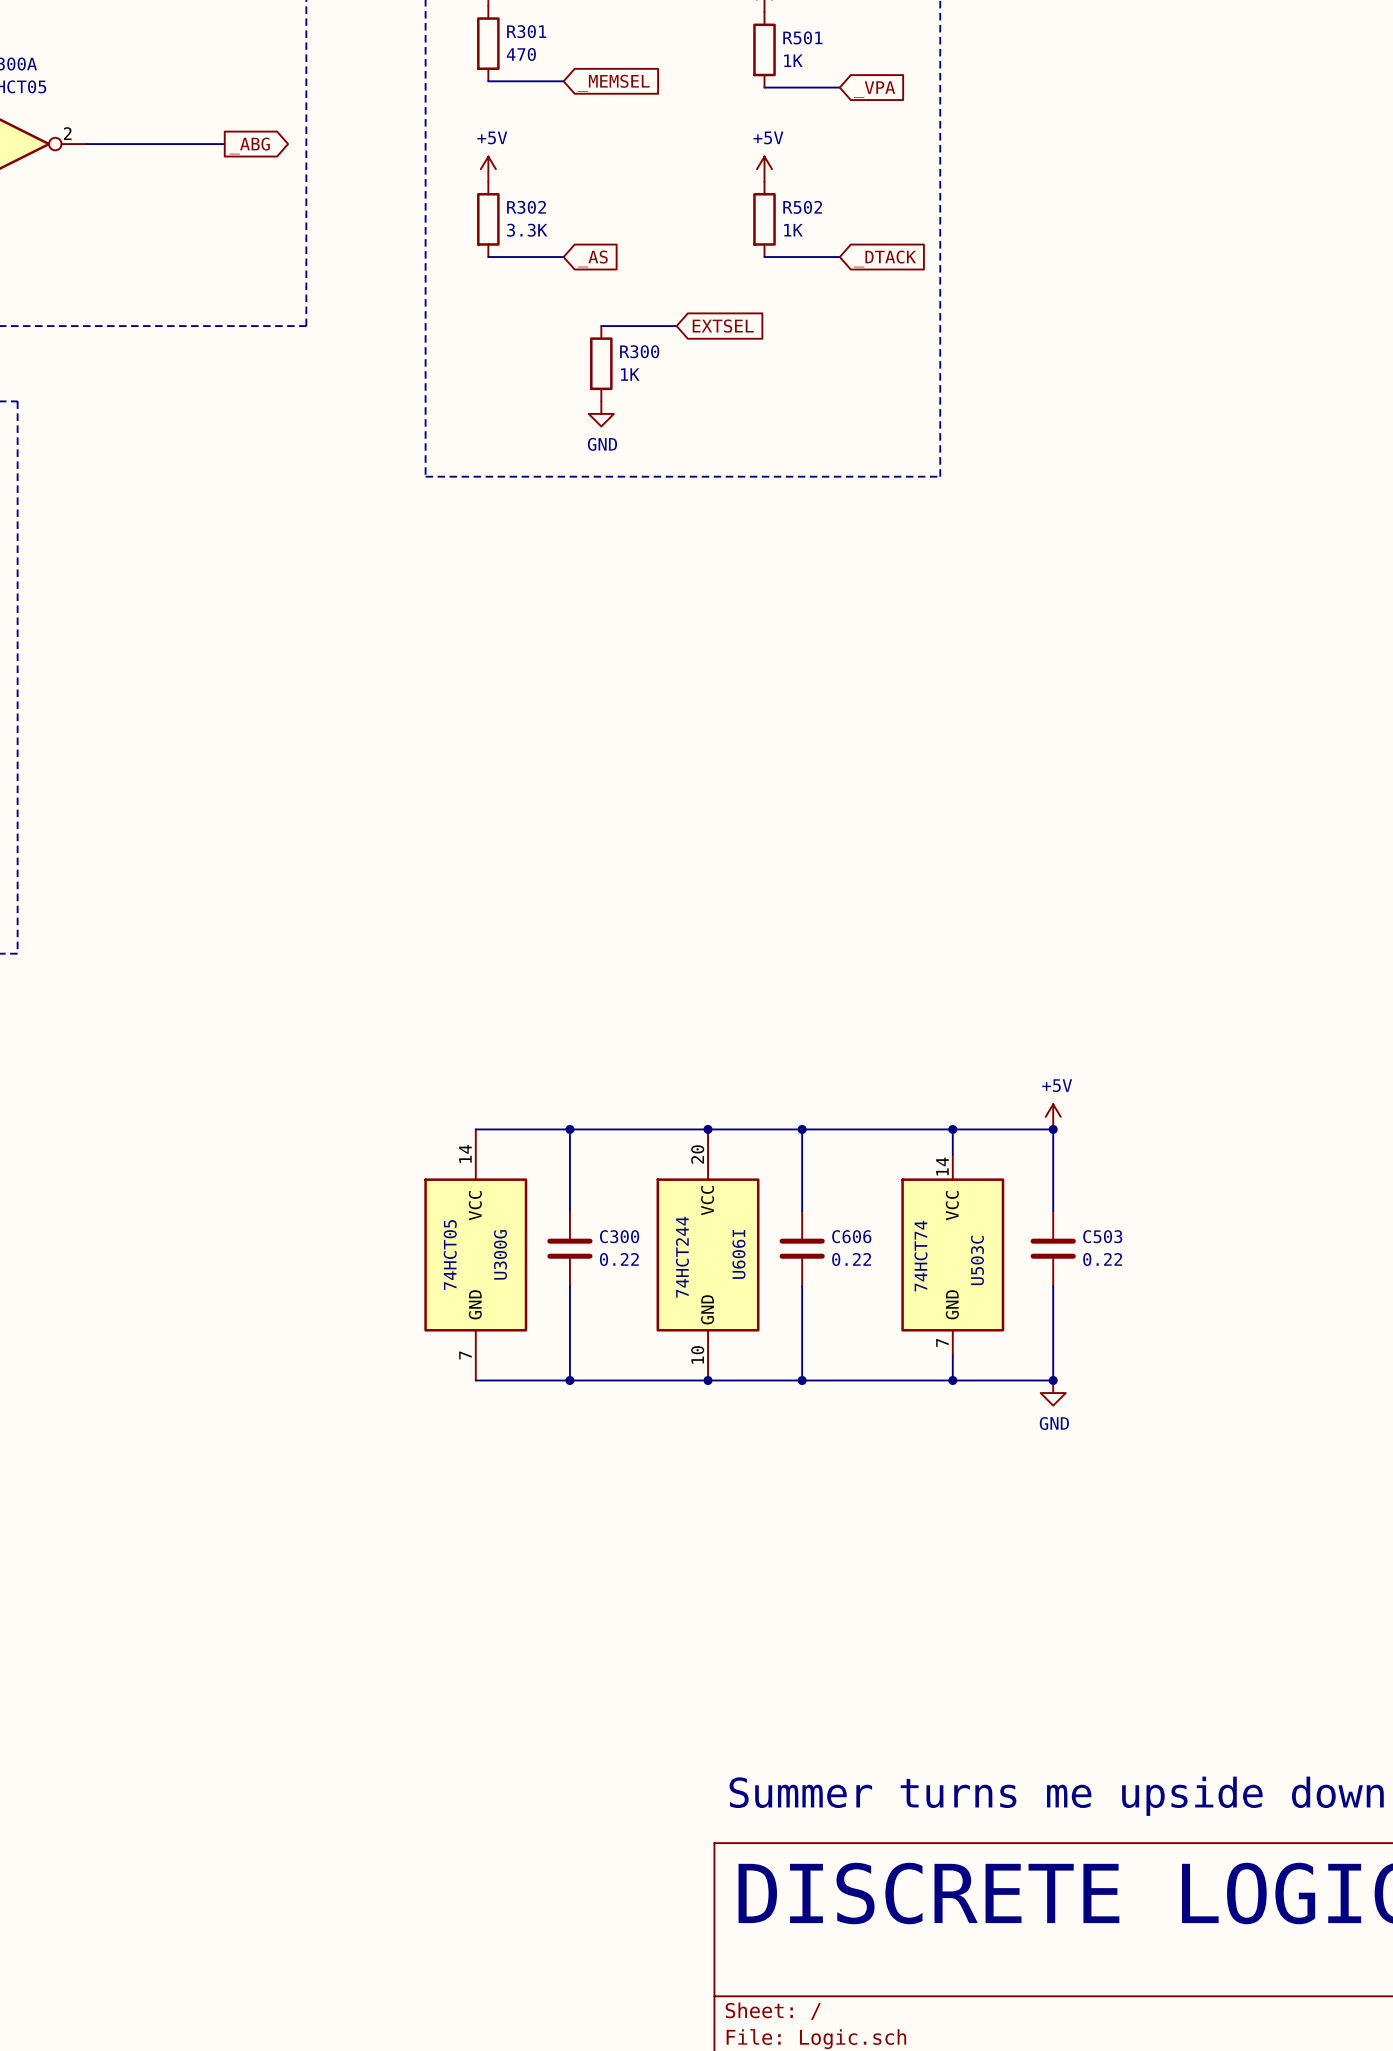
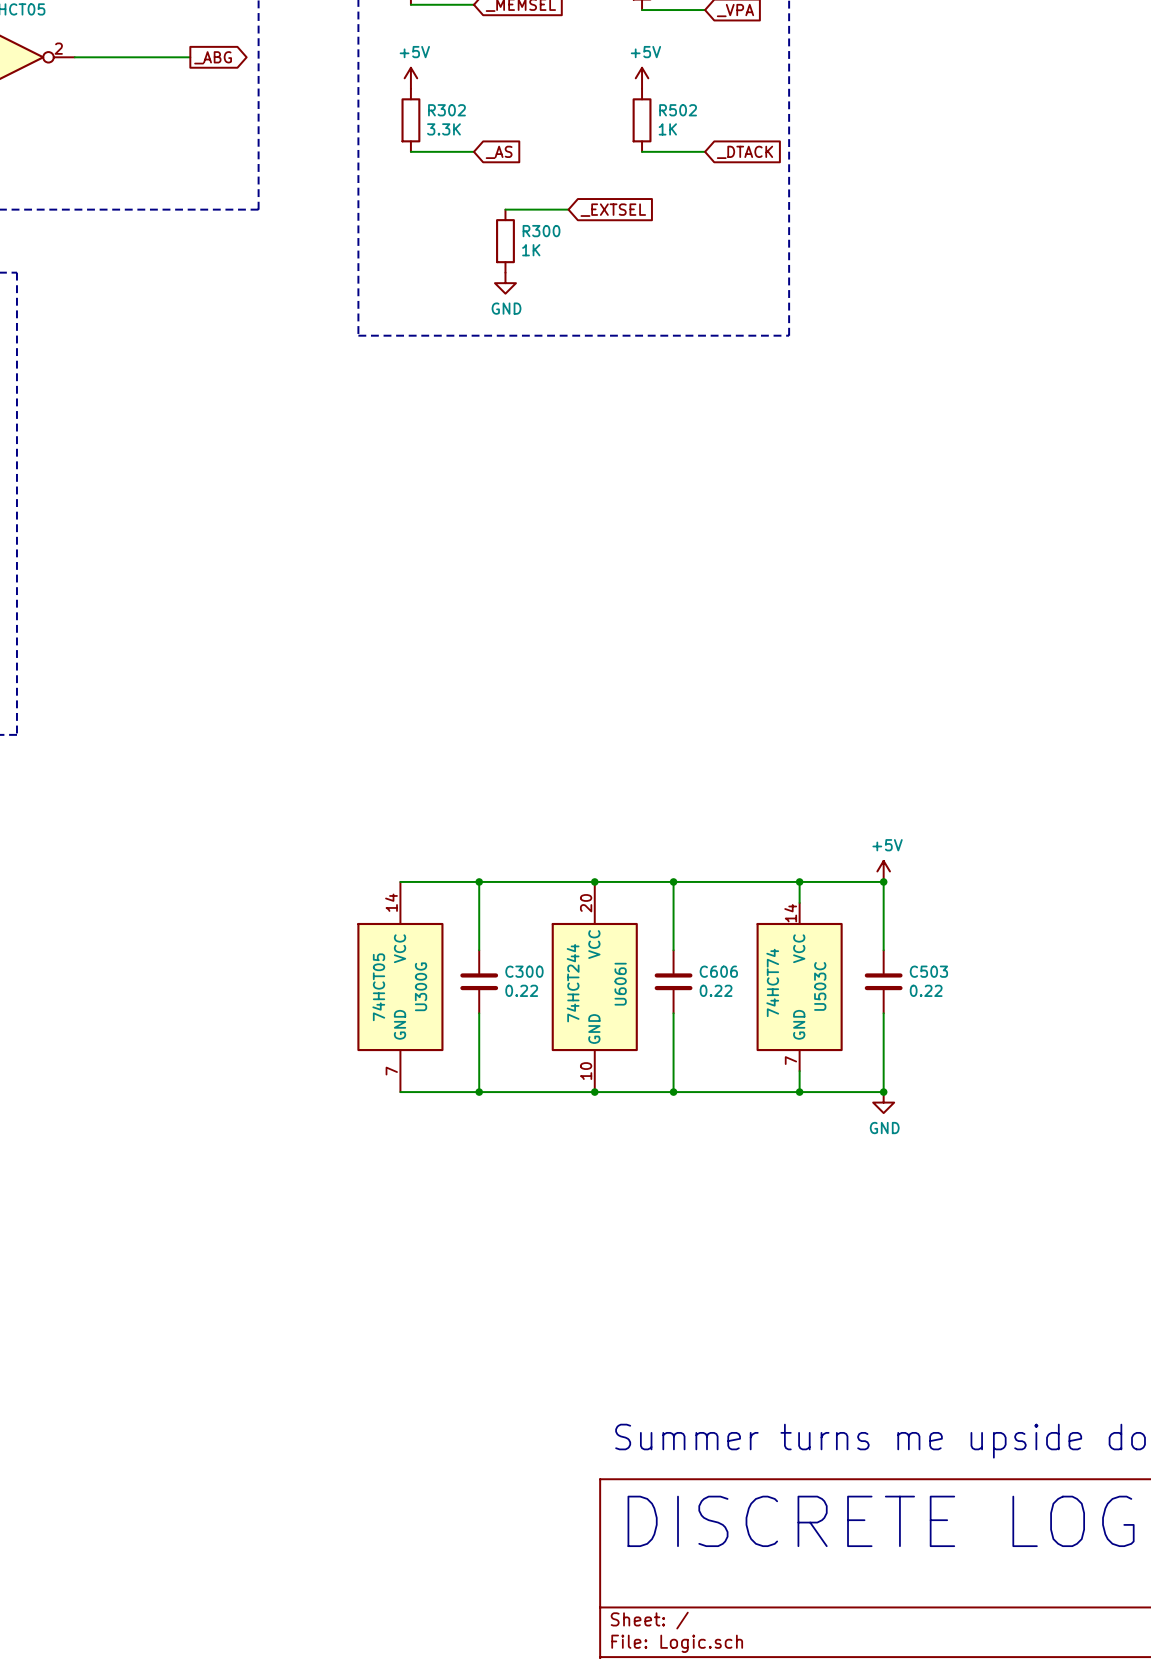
global label: EXTSEL (723, 326) -> _EXTSEL (613, 210)

